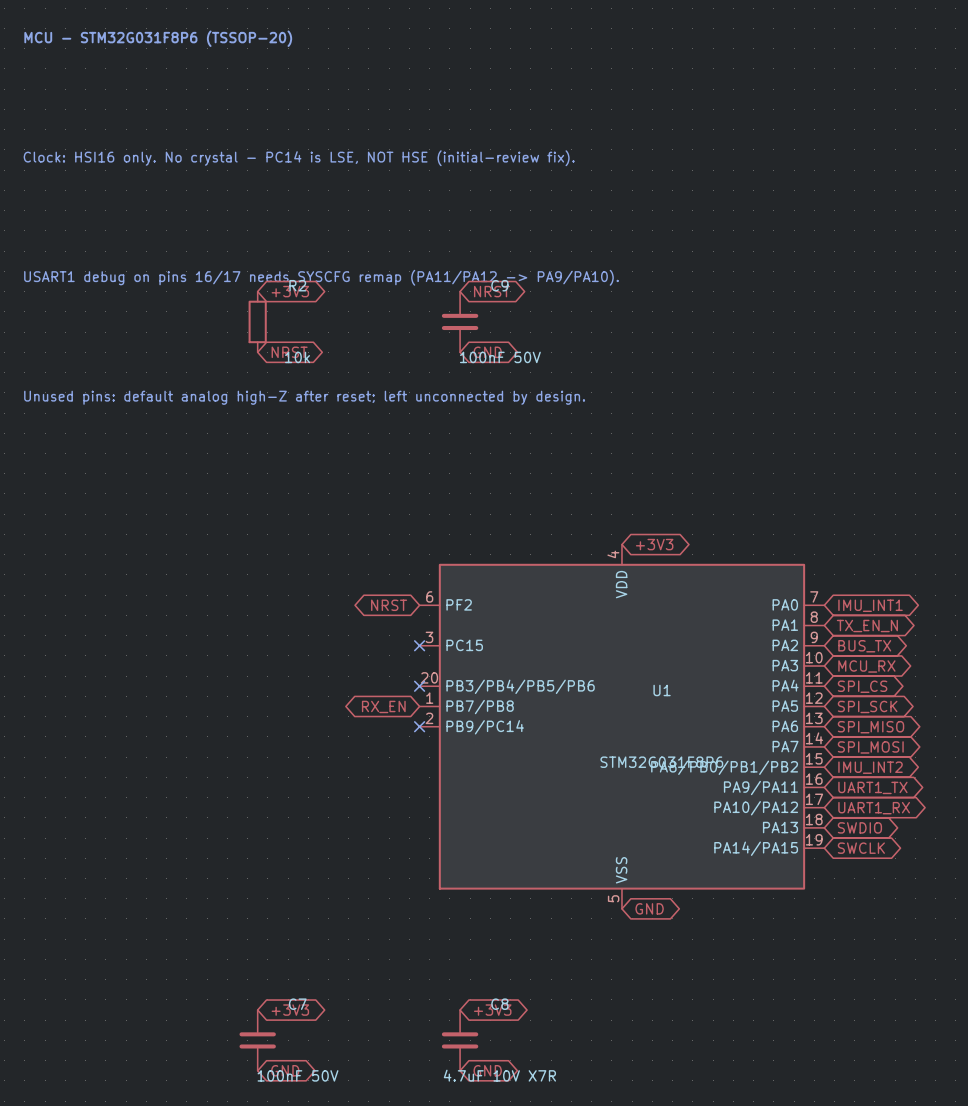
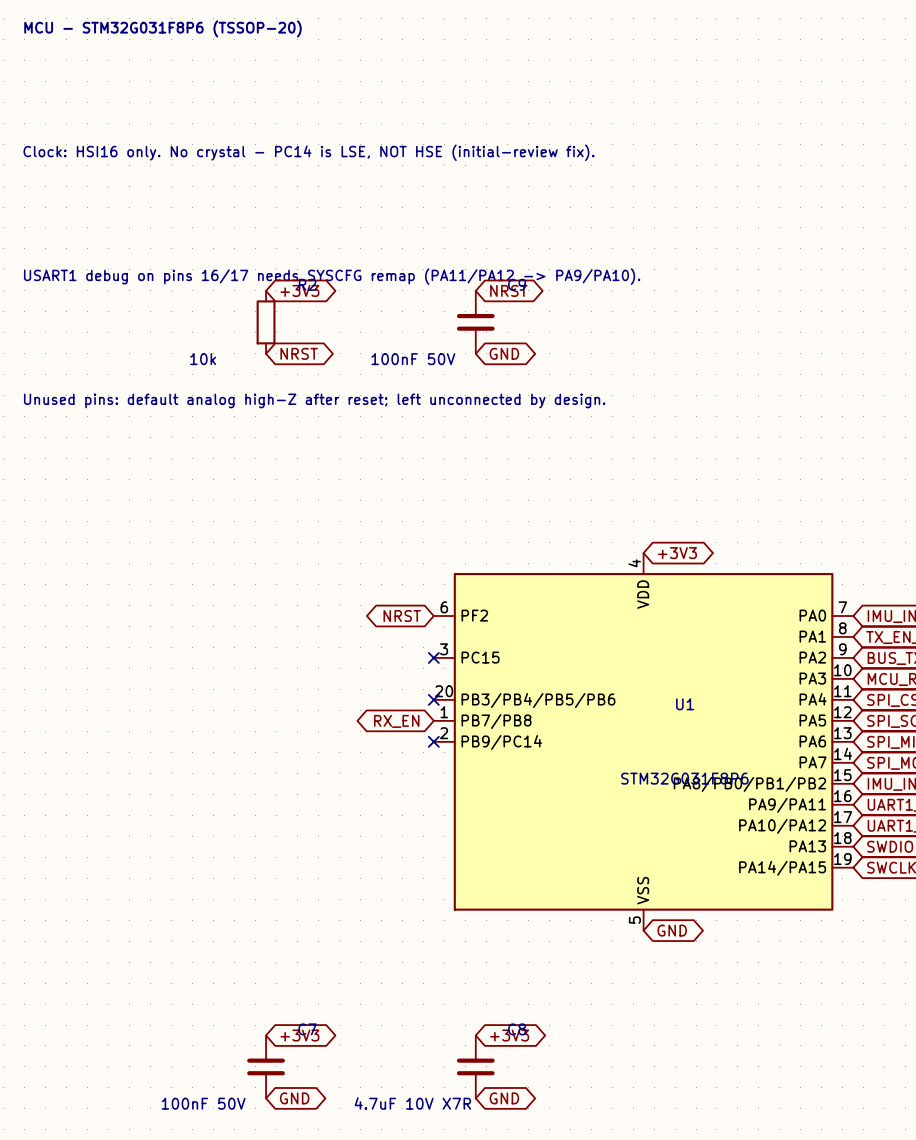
R2 value position: 10k (297, 357) -> 10k (203, 359)
C9 value position: 100nF 50V (500, 357) -> 100nF 50V (413, 359)
C7 value position: 100nF 50V (298, 1075) -> 100nF 50V (203, 1103)
C8 value position: 4.7uF 10V X7R (499, 1075) -> 4.7uF 10V X7R (412, 1103)

